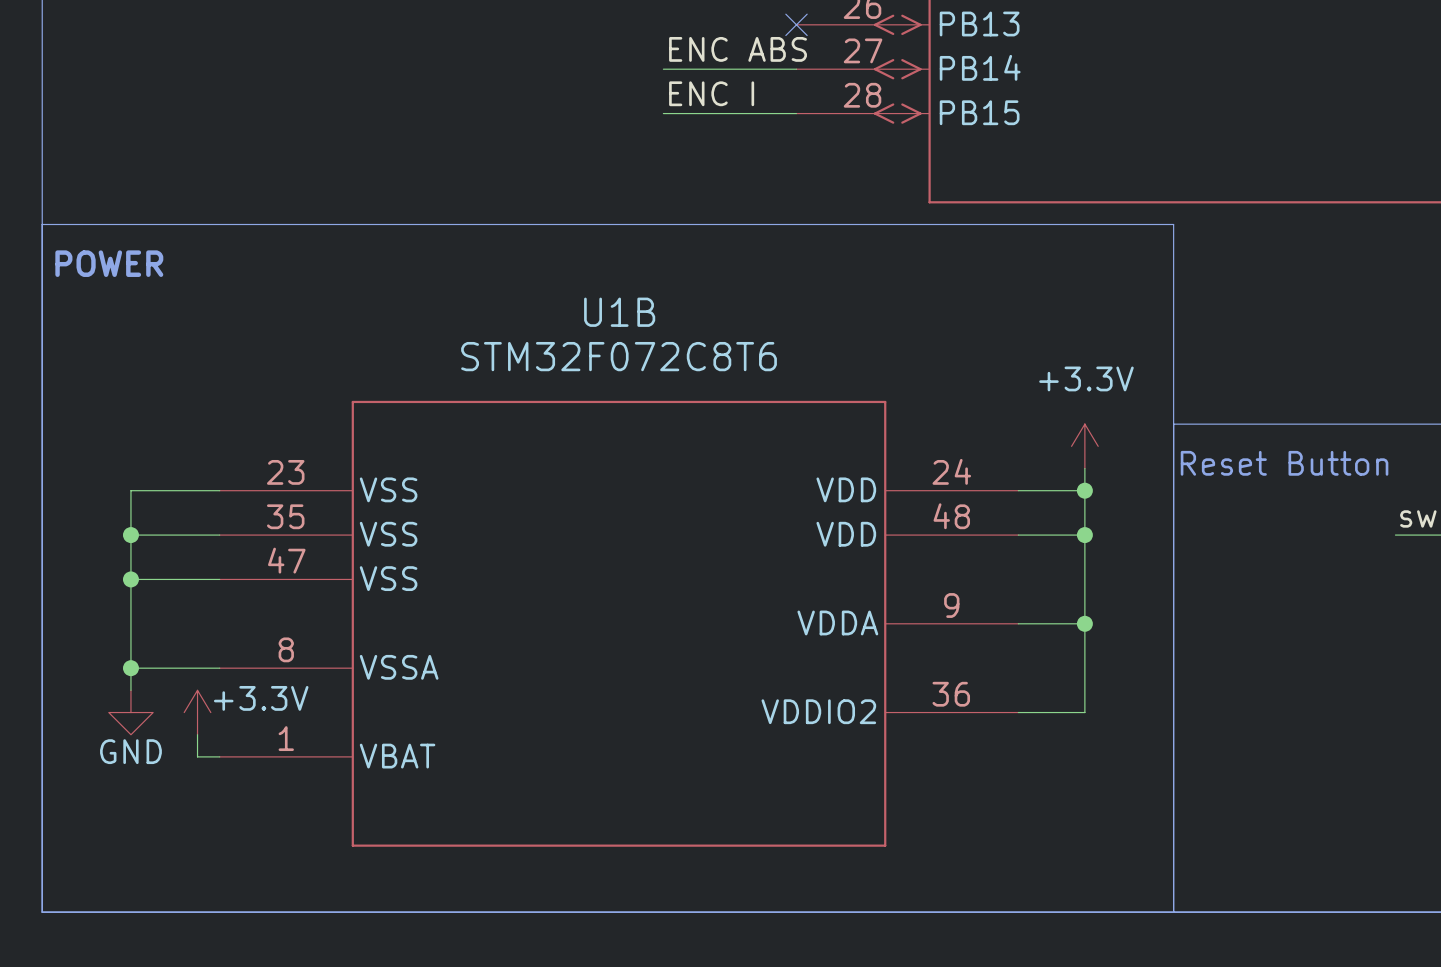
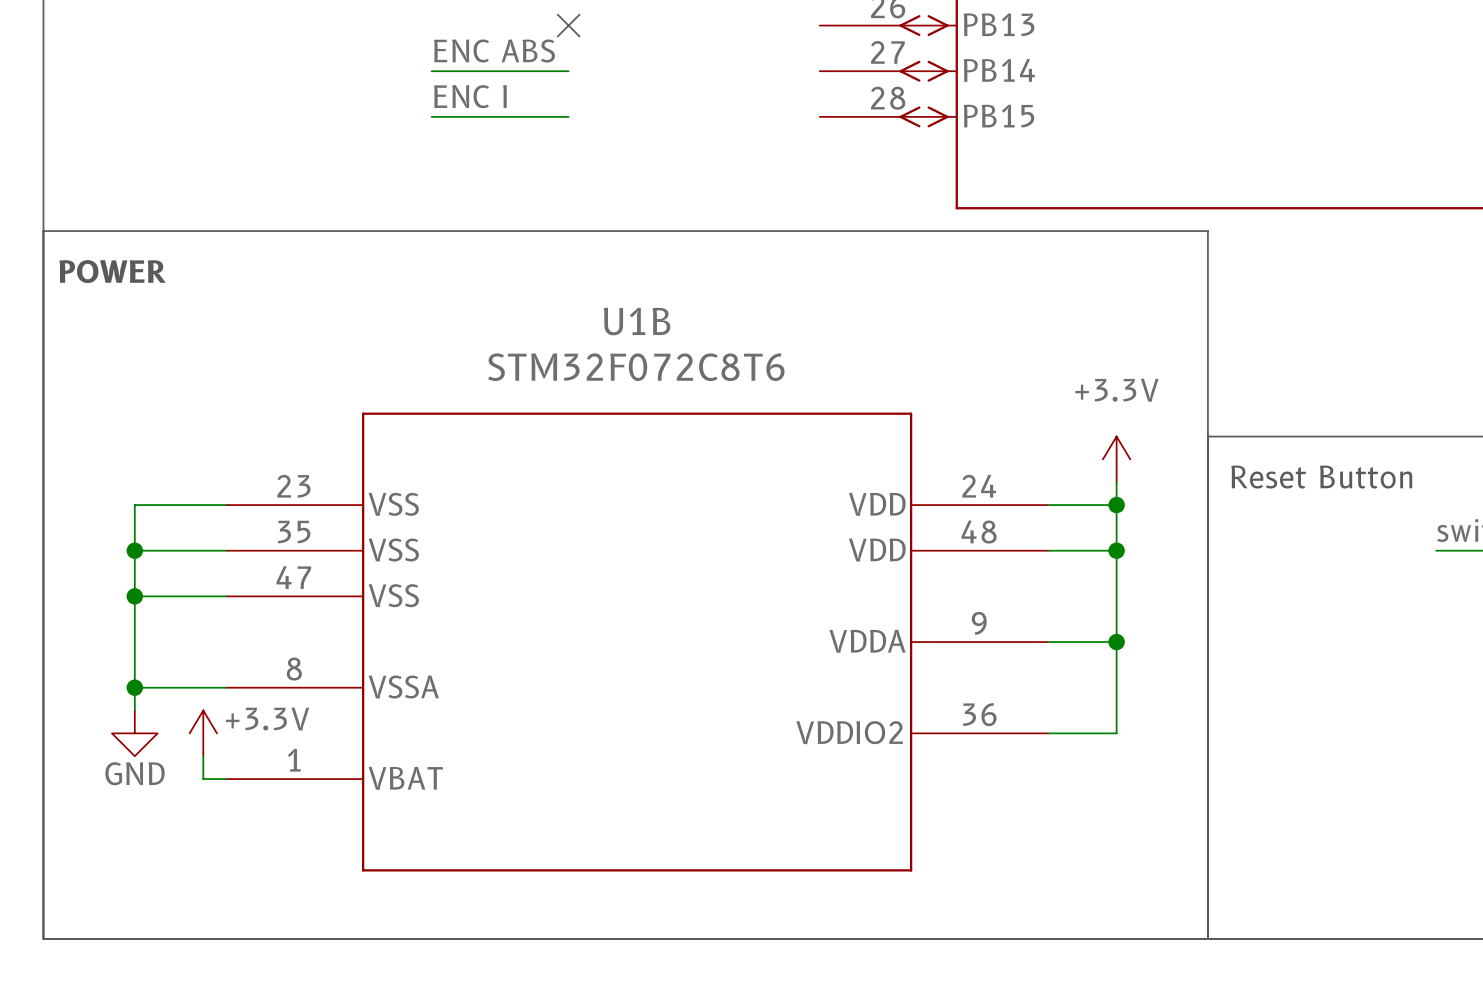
no-connect mark: none -> (568, 25)
no-connect mark: (796, 24) -> none
label position: ENC ABS (738, 49) -> ENC ABS (494, 50)
wire: (663, 69) (796, 69) -> (431, 71) (568, 71)
label position: ENC I (711, 93) -> ENC I (470, 96)
wire: (663, 113) (796, 113) -> (431, 116) (568, 116)

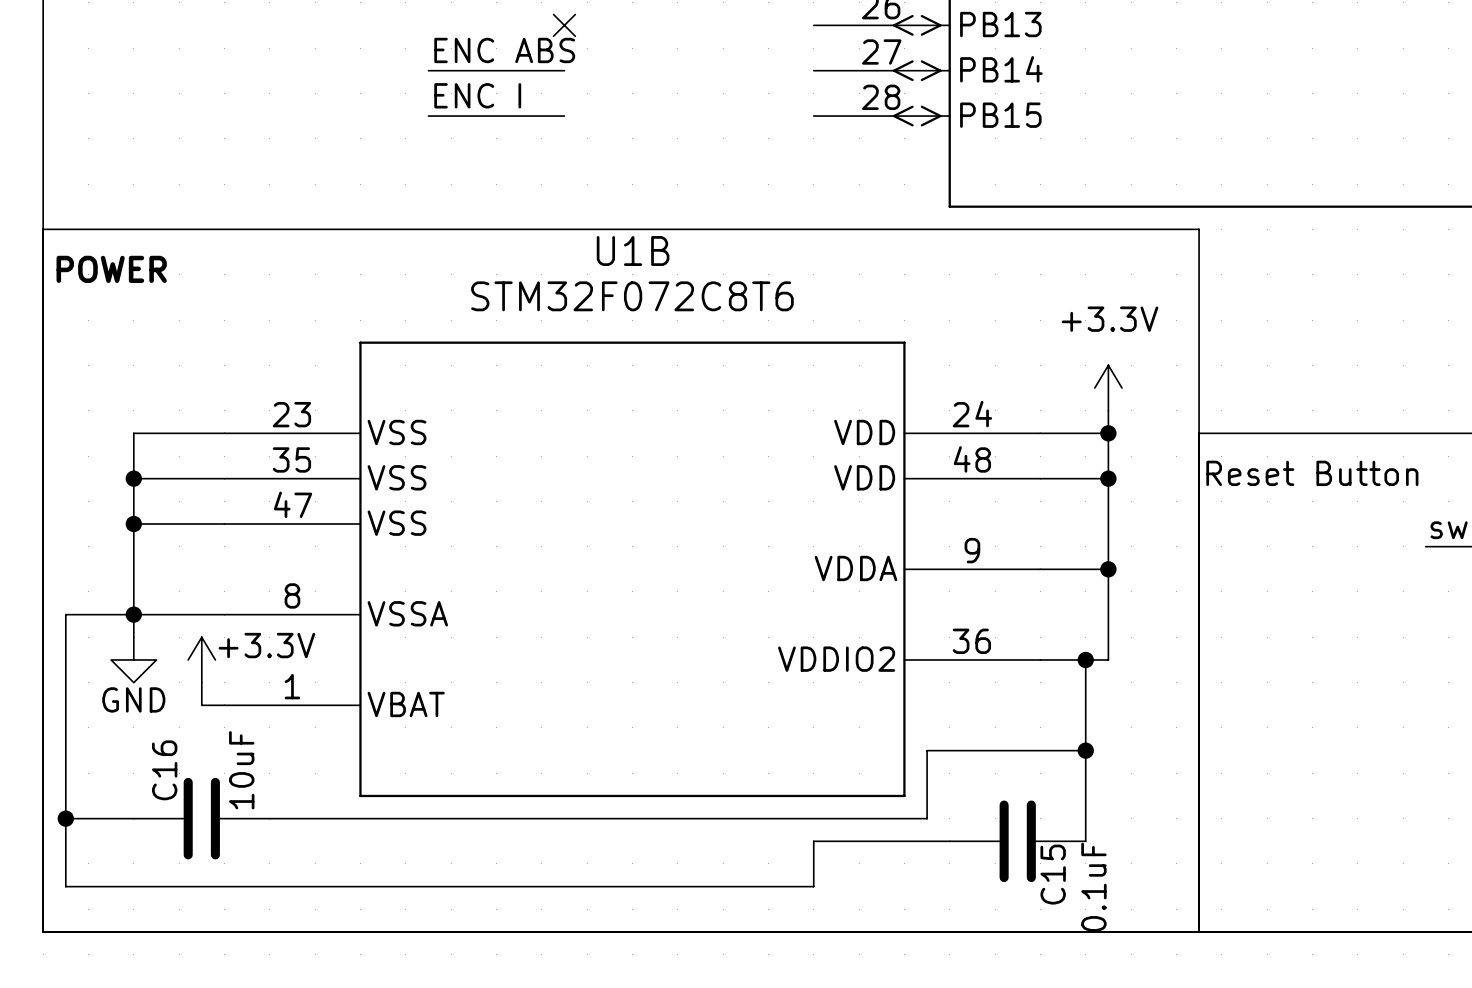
wire: none -> (1108, 410) (1108, 478) (1040, 478)
junction: none -> (1108, 433)
power symbol position: +3.3V (1116, 459) -> +3.3V (1108, 388)
junction: none -> (133, 478)
wire: (134, 505) (226, 505) -> (133, 501) (133, 433) (224, 433)
wire: (1048, 505) (1116, 505) -> (1040, 433) (1108, 433)
junction position: (1116, 505) -> (1108, 478)
wire: (134, 550) (226, 550) -> (133, 478) (224, 478)
junction position: (134, 550) -> (133, 523)
wire: (1048, 550) (1116, 550) -> none
junction position: (1116, 550) -> (1108, 569)
wire: (134, 596) (226, 596) -> (133, 523) (224, 523)
junction position: (134, 596) -> (133, 614)
wire: none -> (224, 614) (65, 614) (65, 886) (813, 886) (813, 841) (949, 841)
wire: (134, 642) (134, 710) -> none
U1B position: (637, 642) -> (632, 569)
wire: (1048, 642) (1116, 642) -> (1040, 569) (1108, 569)
junction position: (1116, 642) -> (1085, 659)
wire: none -> (1085, 659) (1085, 841)
wire: (1116, 664) (1116, 733) (1048, 733) -> (1108, 659) (1040, 659)
wire: (134, 687) (226, 687) -> none
junction: (134, 687) -> none
power symbol position: GND (134, 733) -> GND (133, 659)
power symbol position: +3.3V (203, 733) -> +3.3V (201, 659)
wire: (203, 756) (203, 779) (226, 779) -> (201, 682) (201, 705) (224, 705)
wire: none -> (1085, 750) (927, 750) (927, 818) (269, 818)
junction: none -> (1085, 750)
wire: none -> (65, 818) (133, 818)
junction: none -> (65, 818)
C16: none -> 10uF (201, 818)
C15: none -> 0.1uF (1017, 841)

